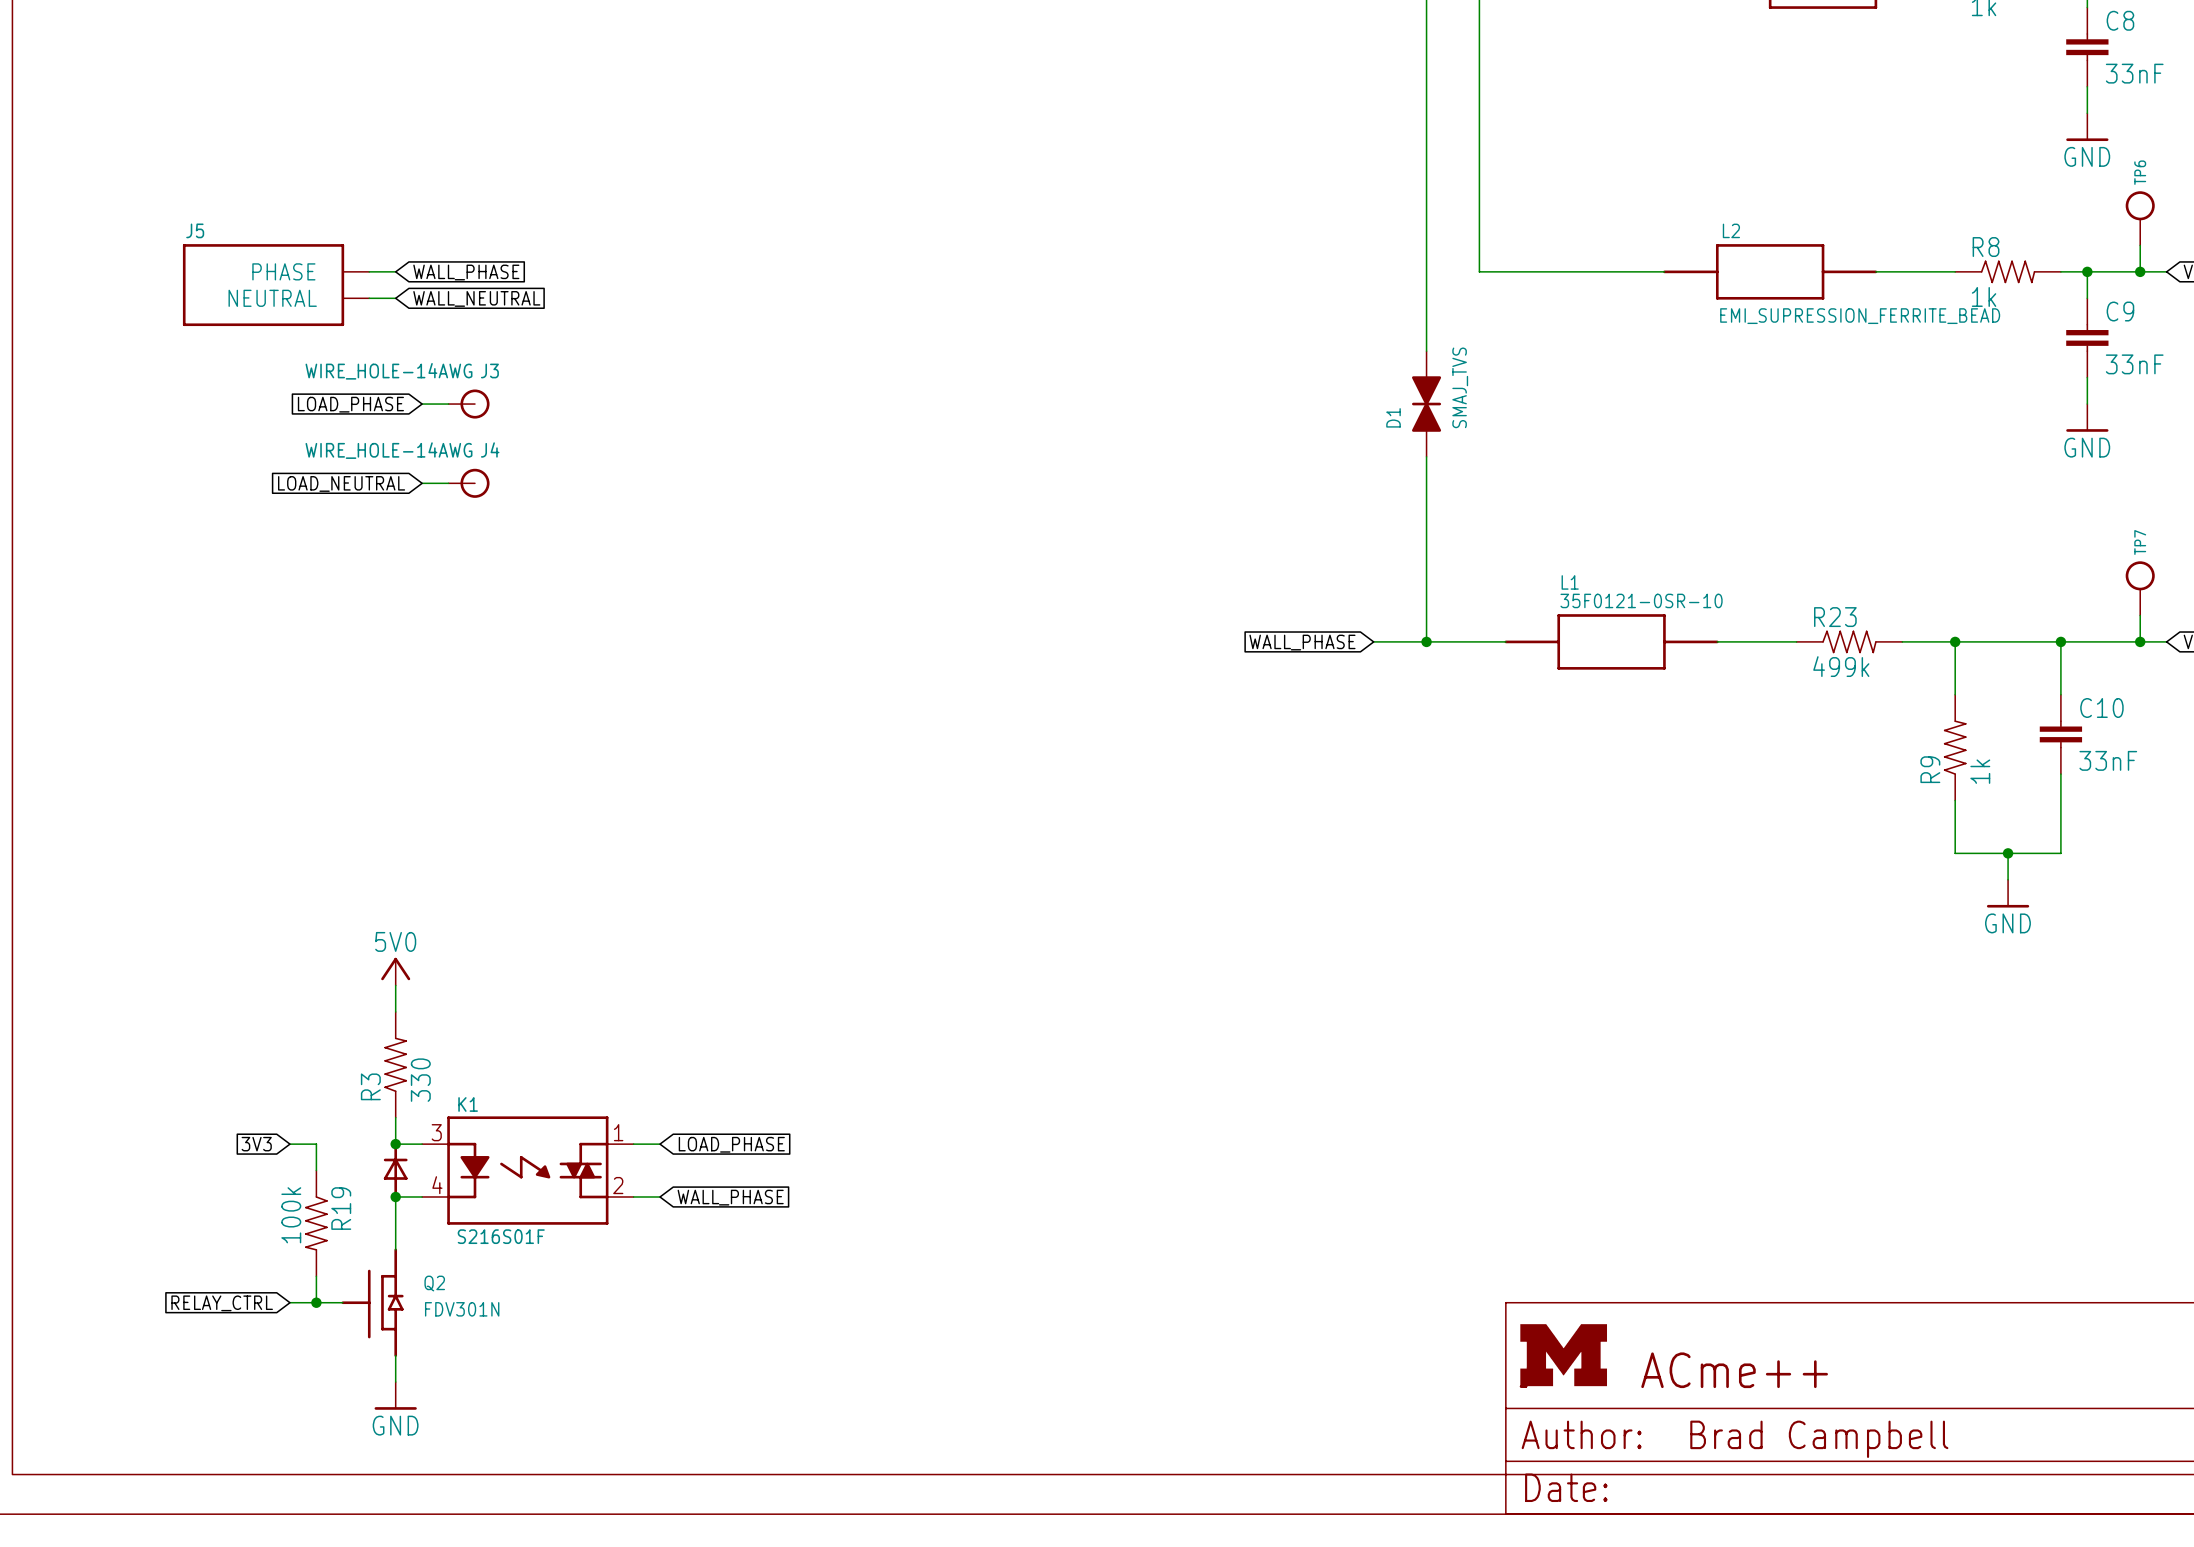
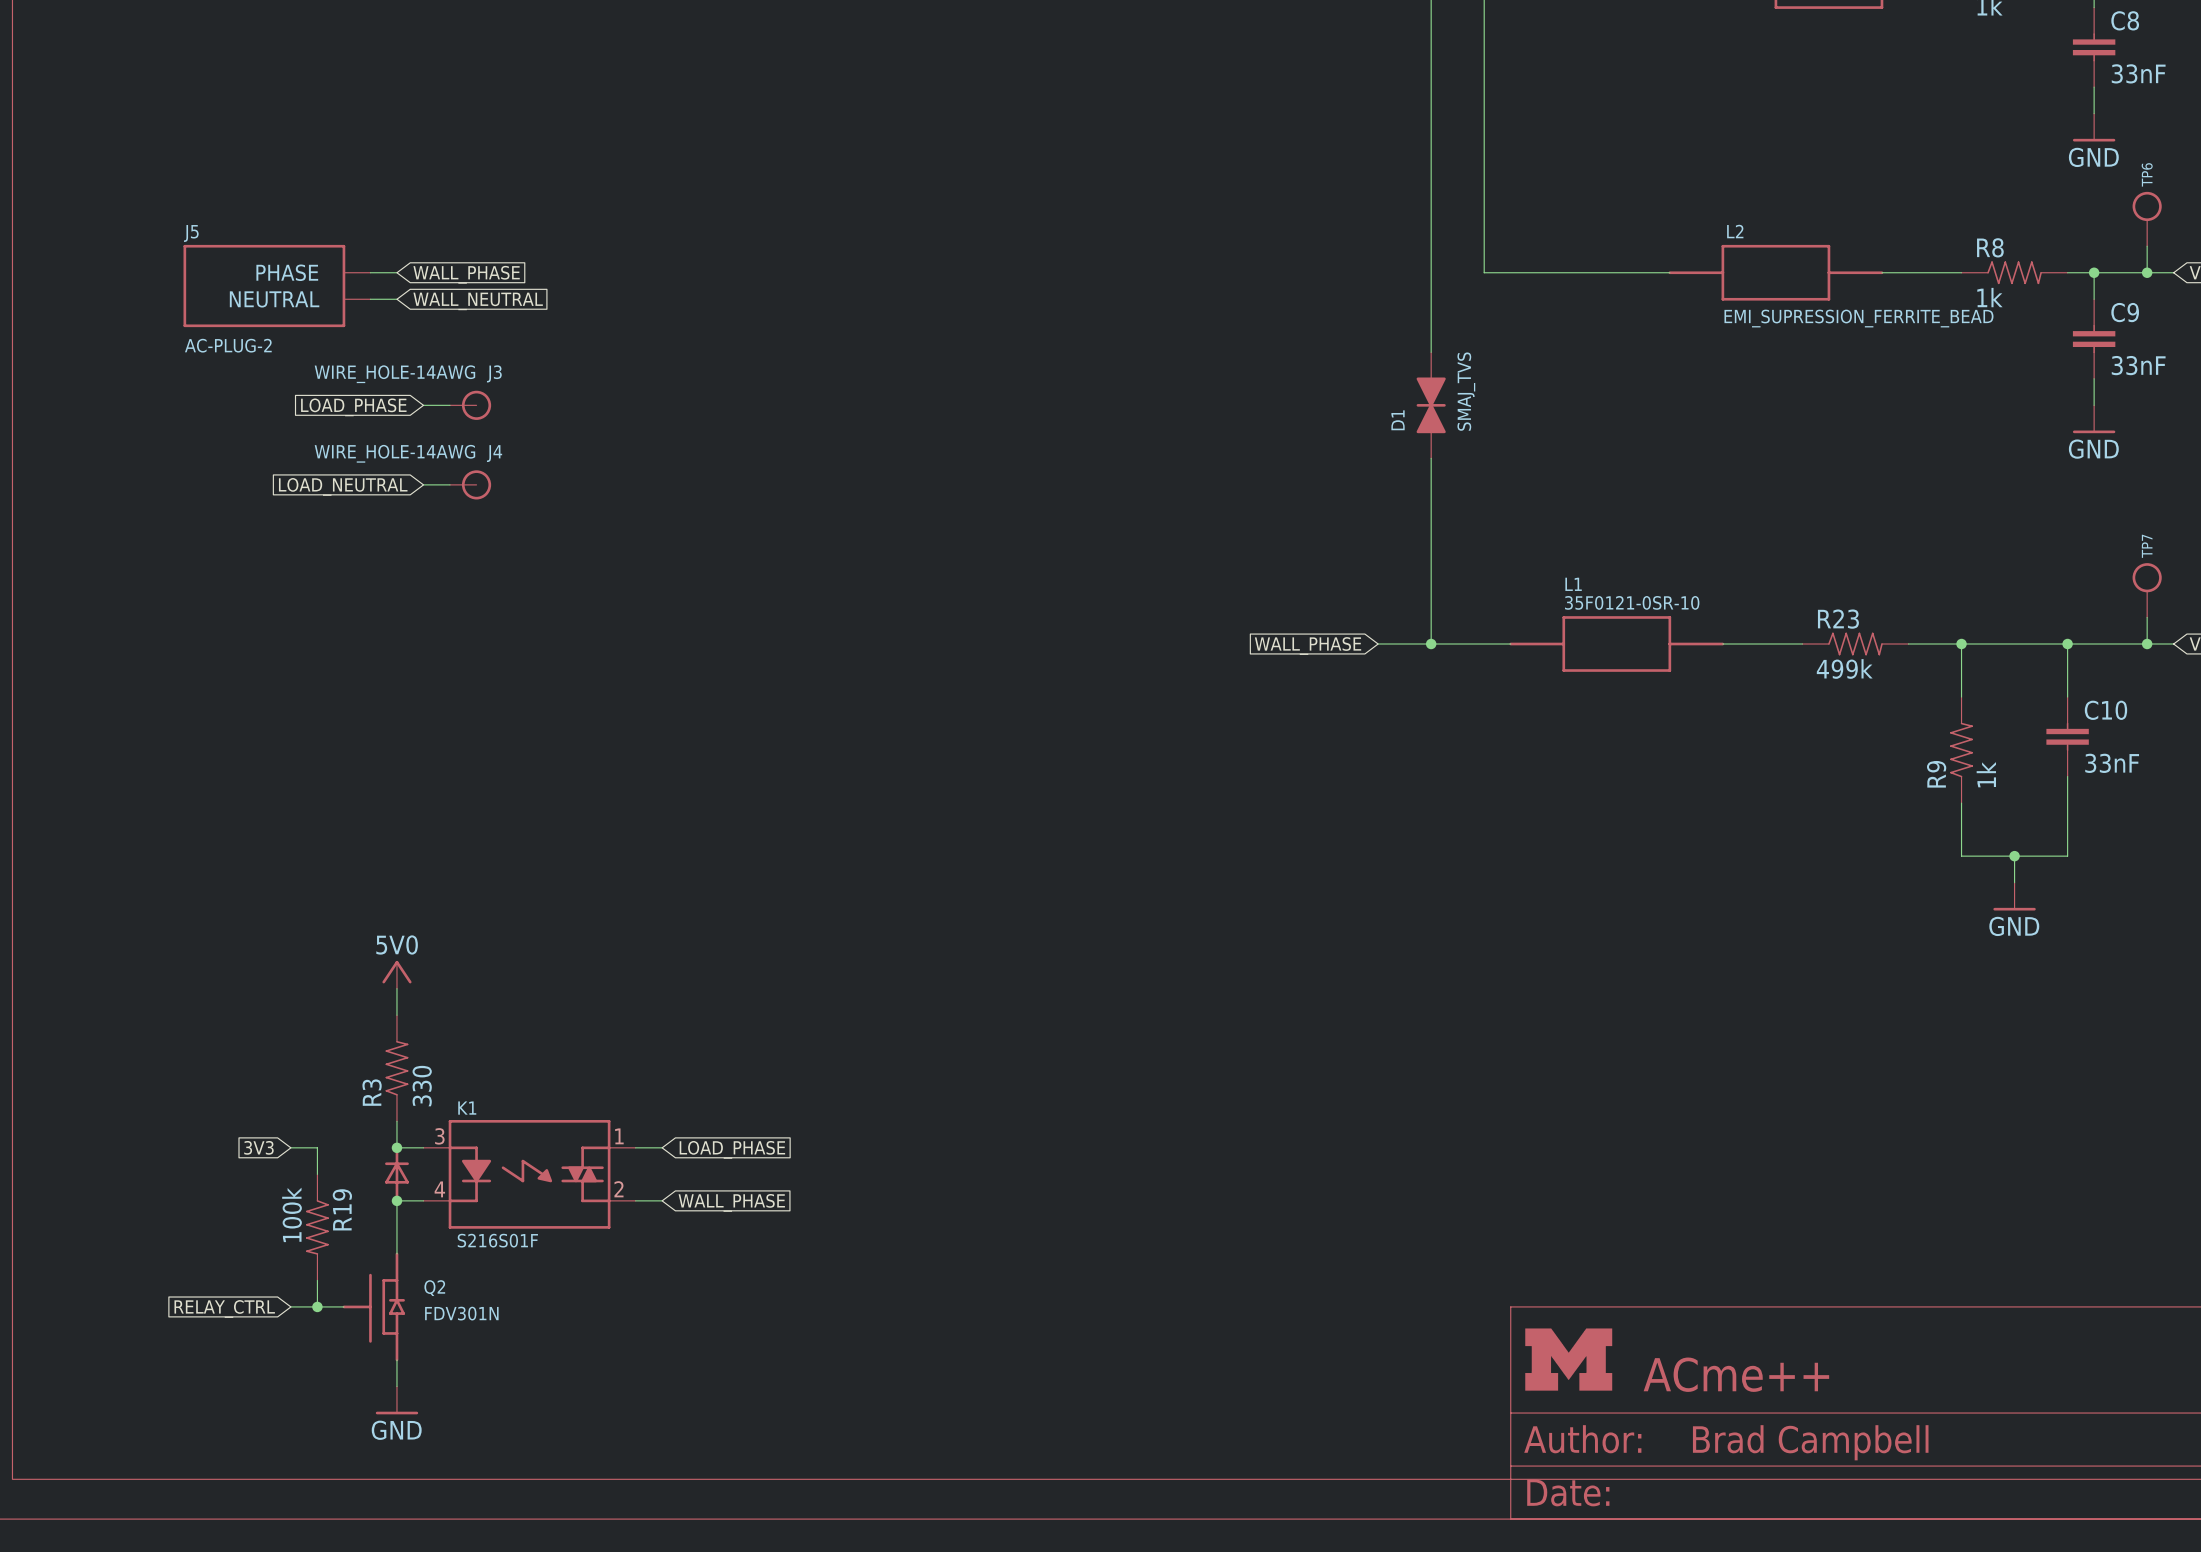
J5 value: none -> AC-PLUG-2 (228, 345)

